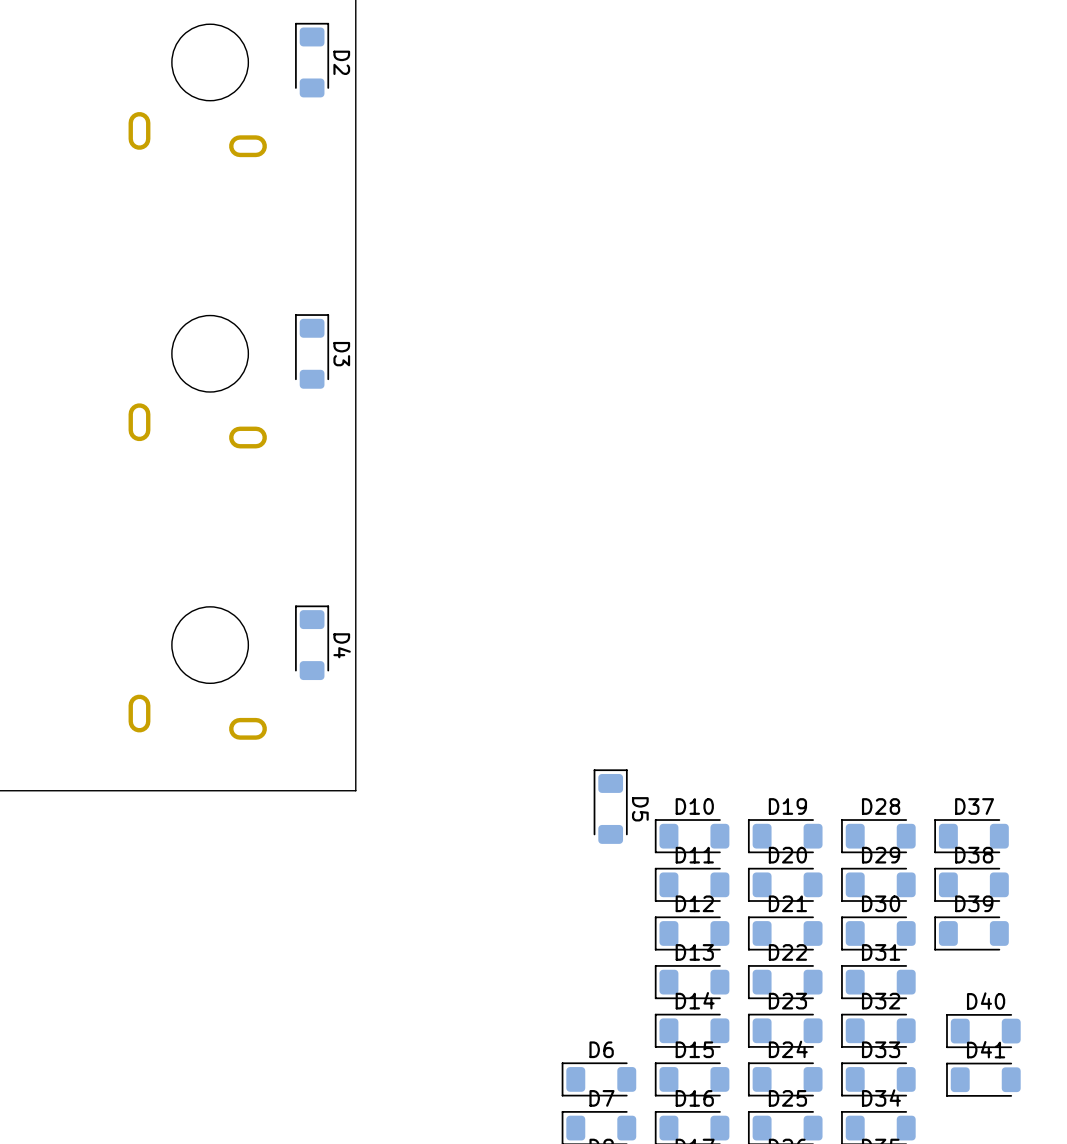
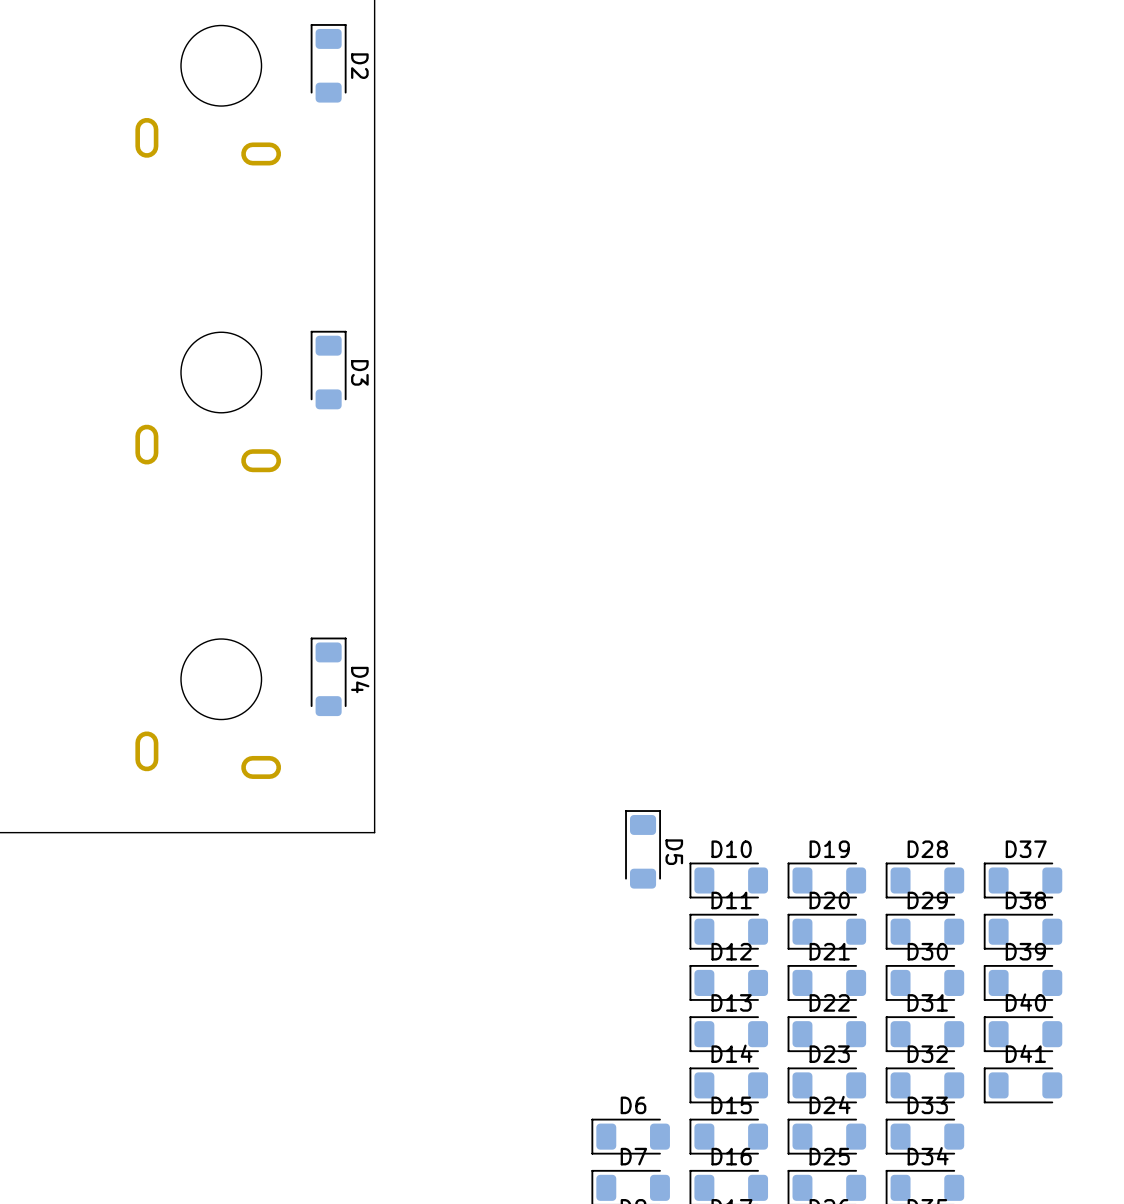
D40 position: (983, 1031) -> (1023, 1034)
D41 position: (983, 1079) -> (1023, 1085)

